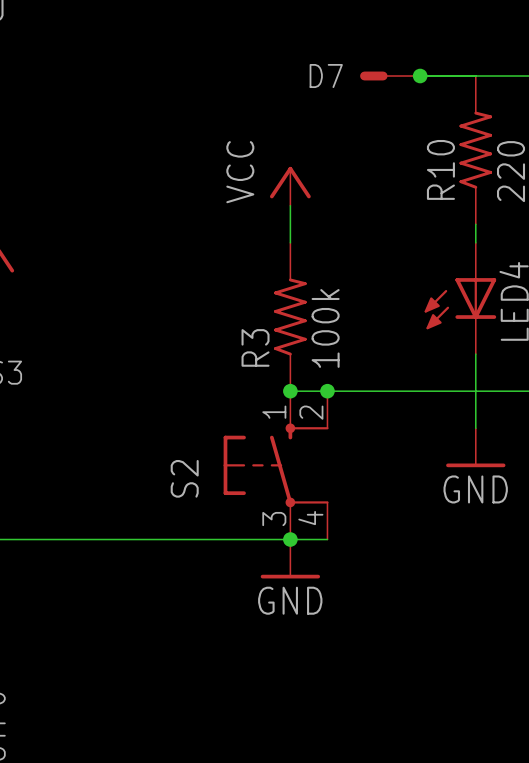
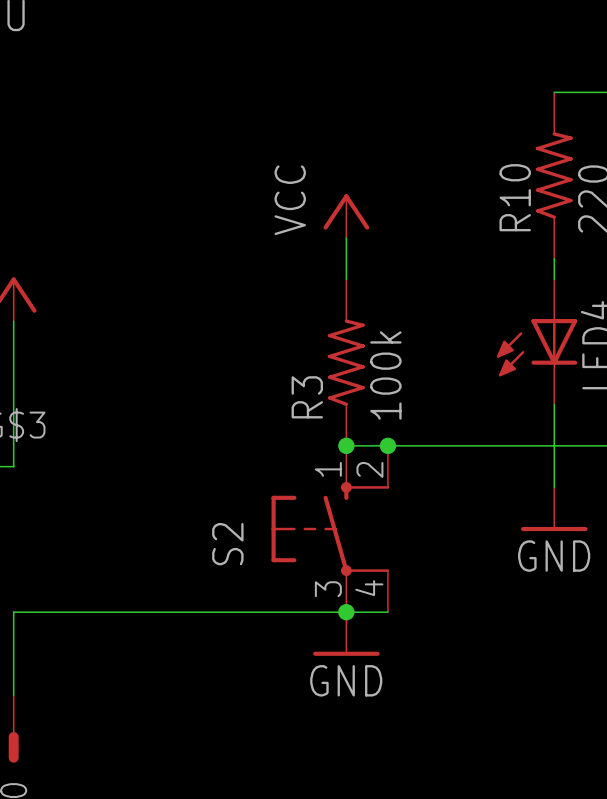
D7: (390, 76) -> none
wire: (420, 76) (475, 76) -> none
junction: (420, 76) -> none

